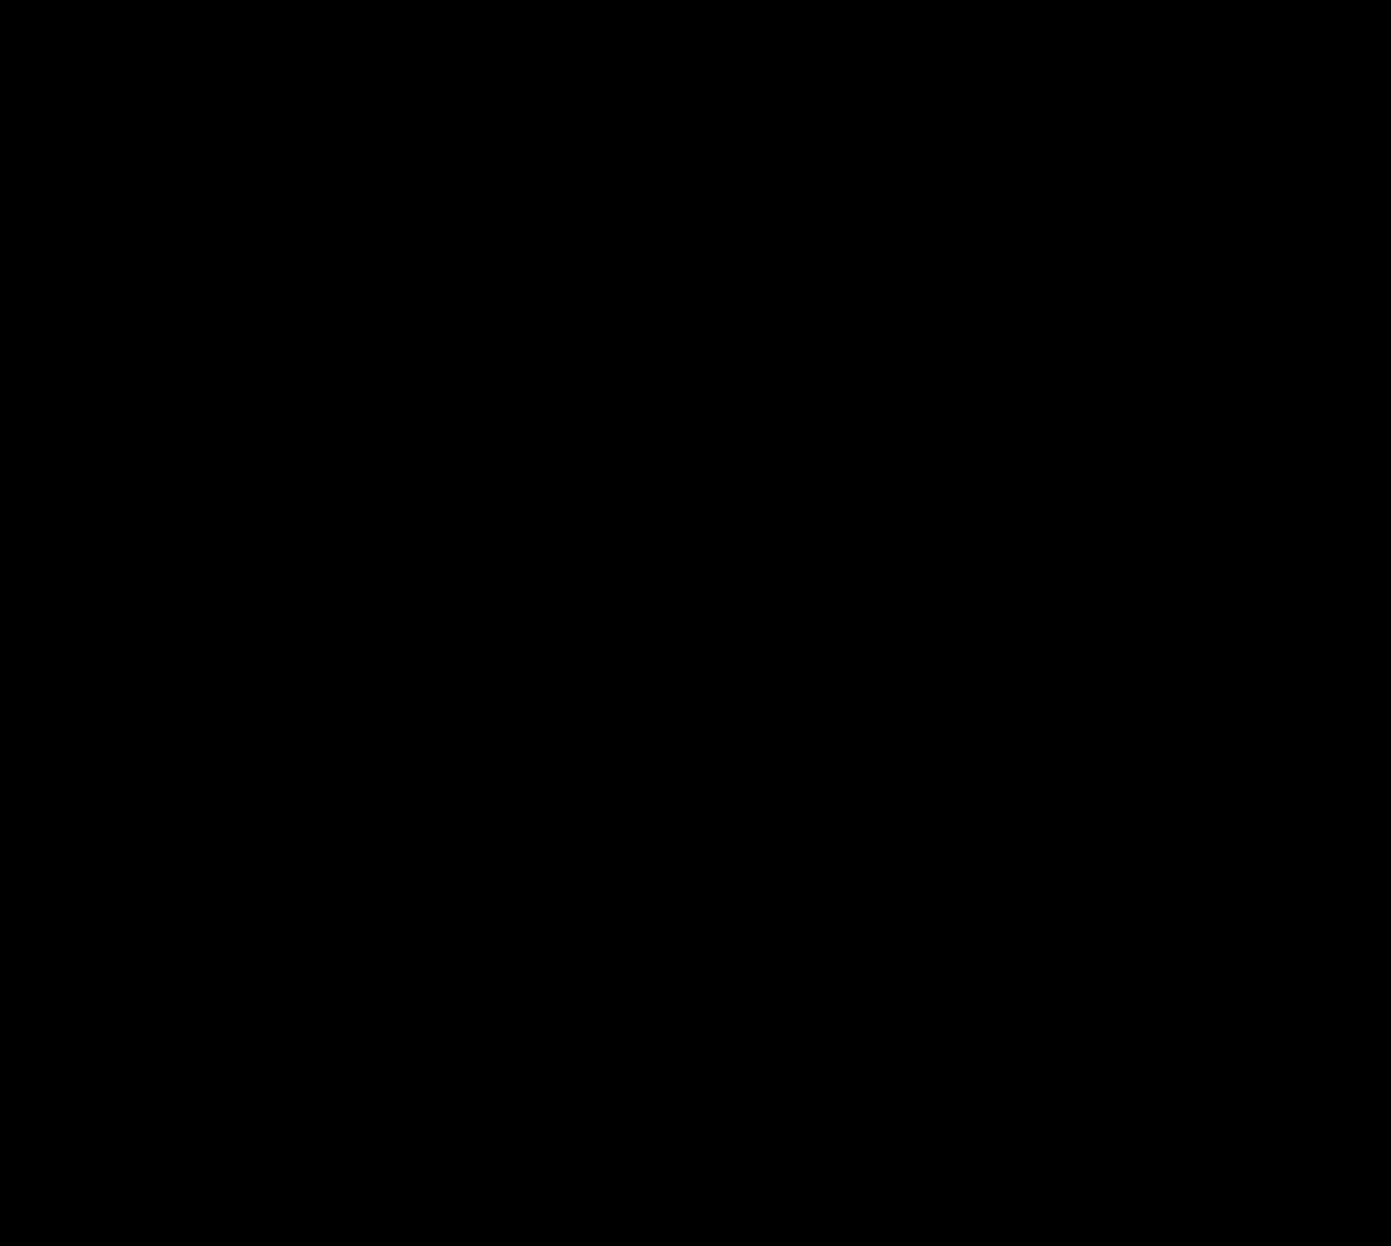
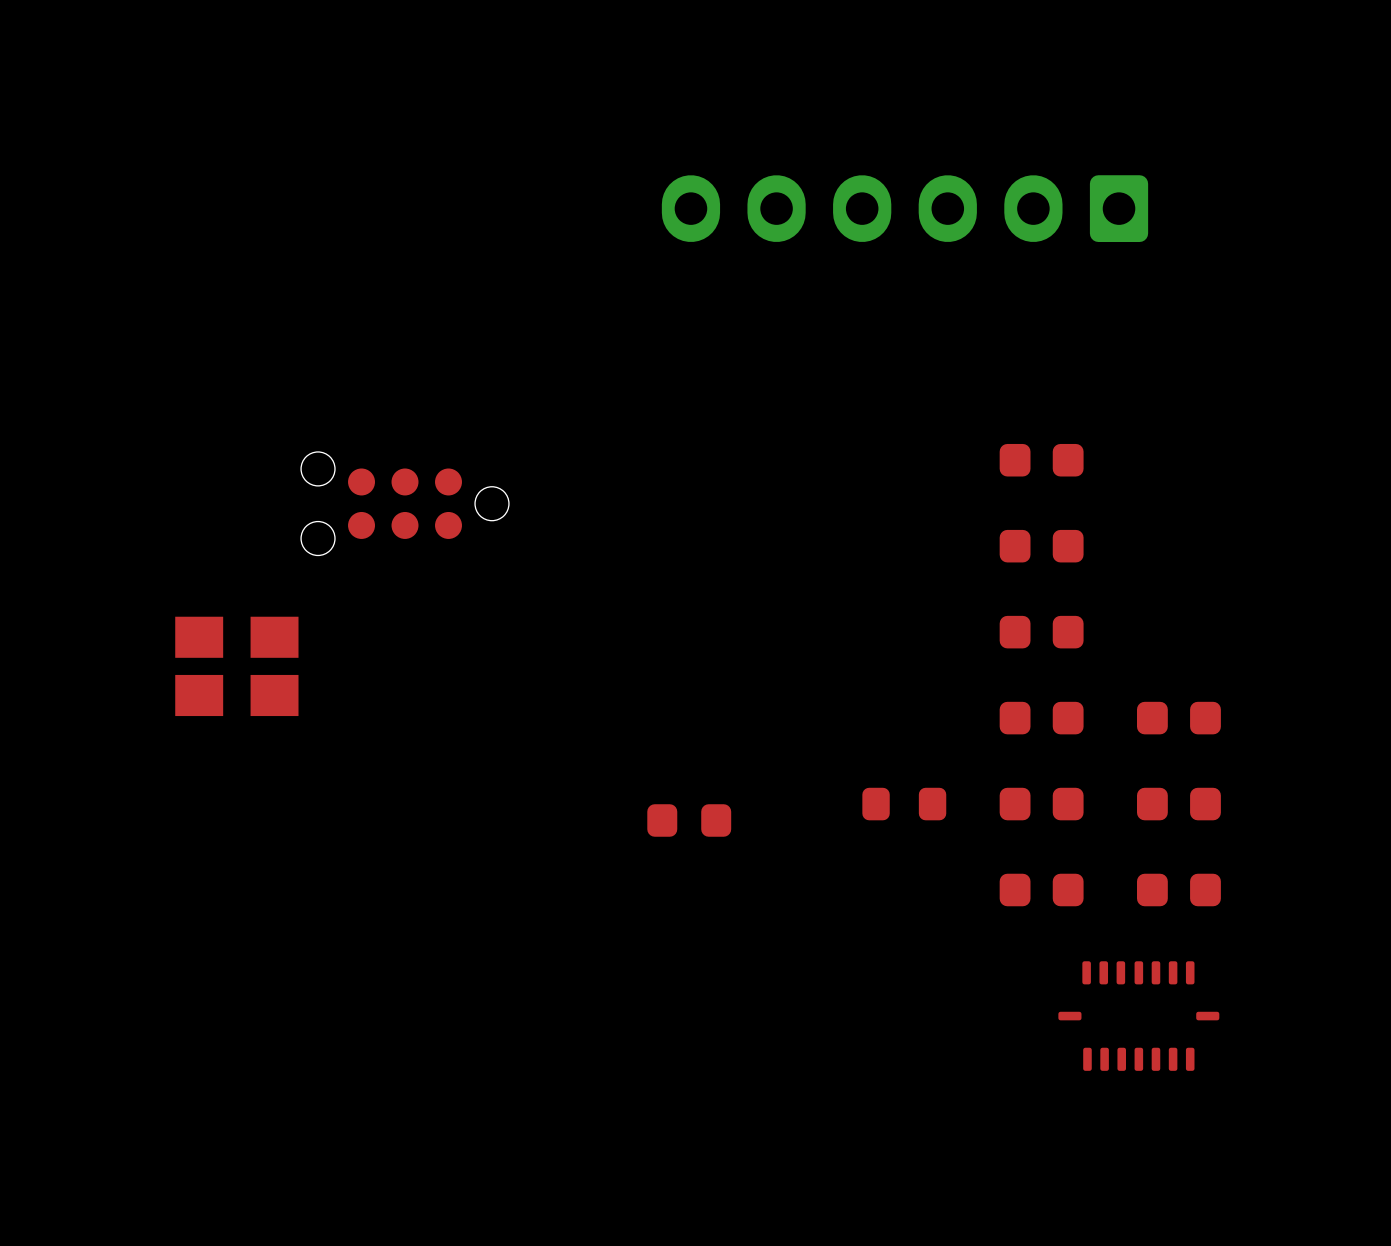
part: none -> (904, 208)
part: none -> (1041, 460)
part: none -> (405, 503)
part: none -> (1041, 546)
part: none -> (1041, 632)
part: none -> (236, 666)
part: none -> (1041, 718)
part: none -> (1178, 718)
part: none -> (904, 804)
part: none -> (1041, 804)
part: none -> (1178, 804)
part: none -> (689, 820)
part: none -> (1041, 890)
part: none -> (1178, 890)
part: none -> (1138, 1016)

